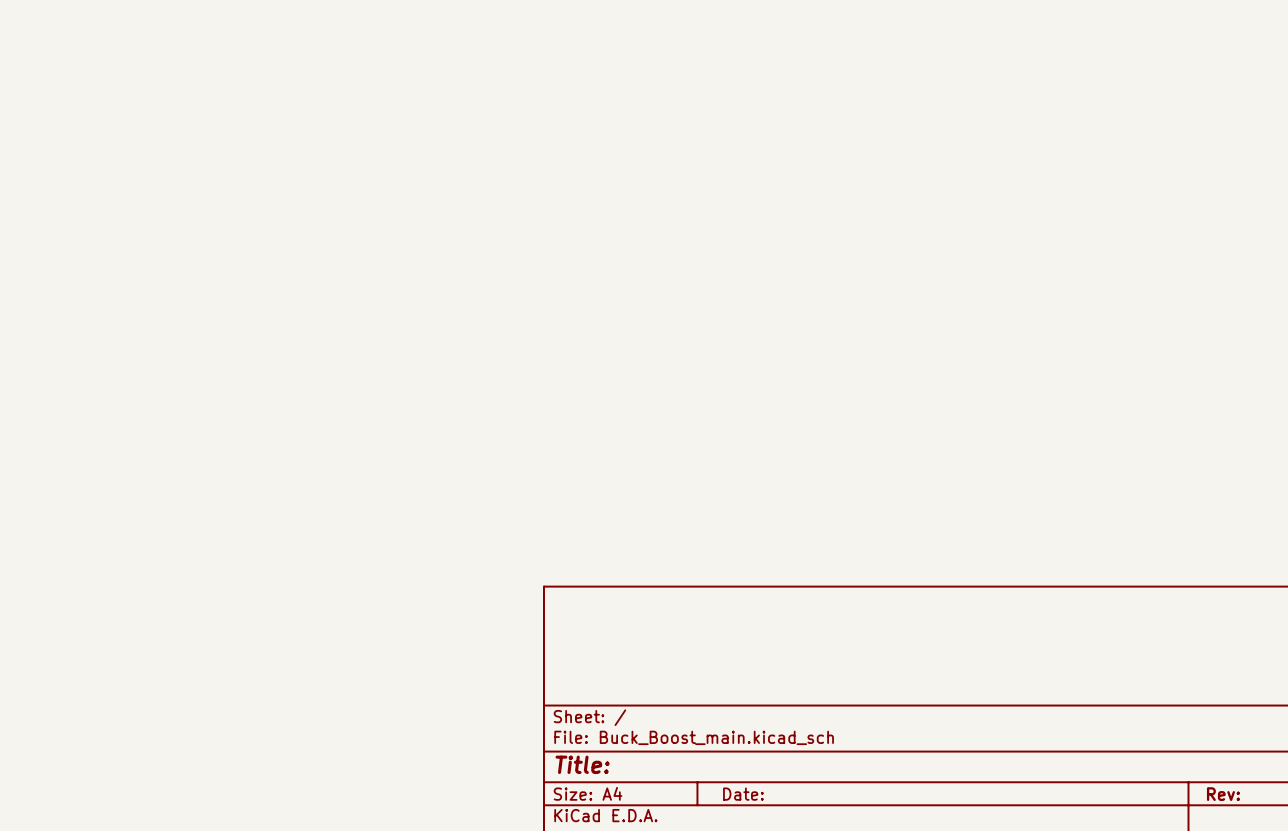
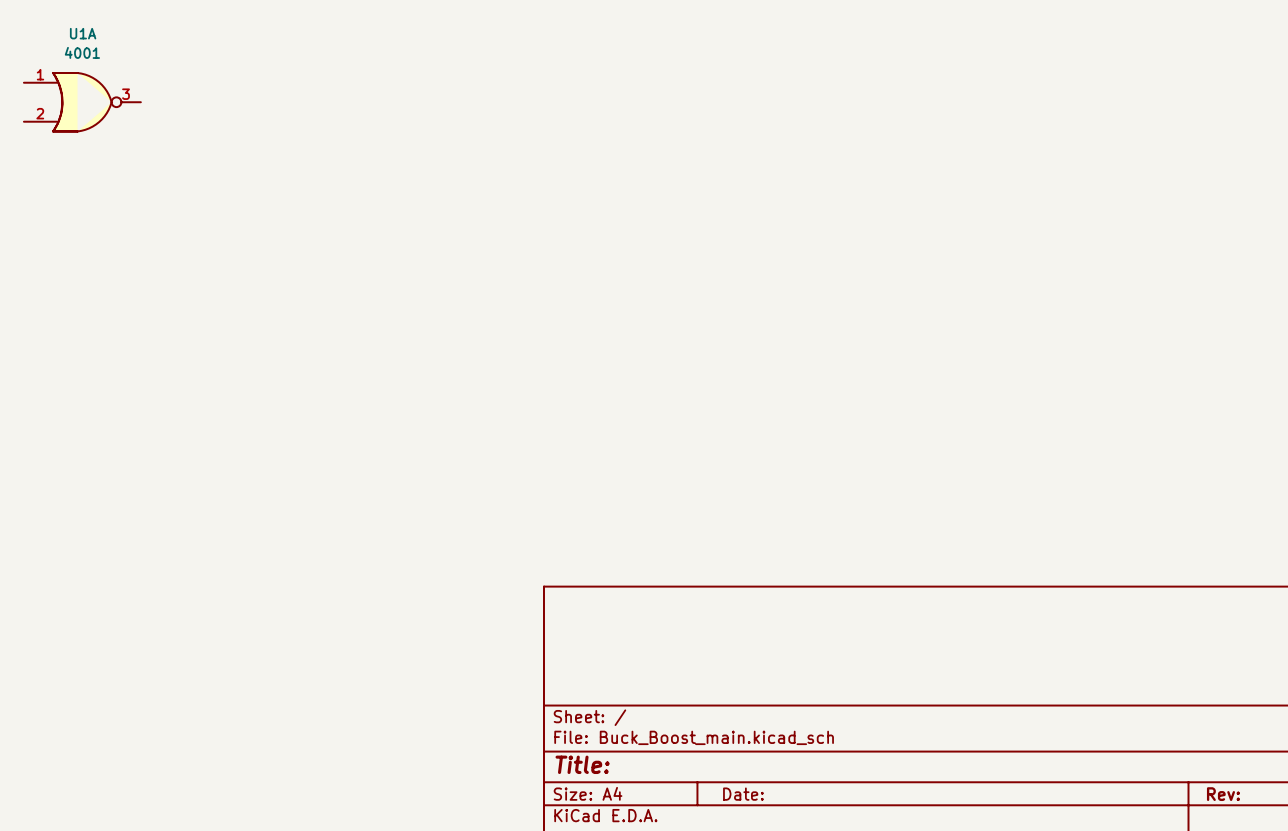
U1A: none -> 4001 (82, 102)

